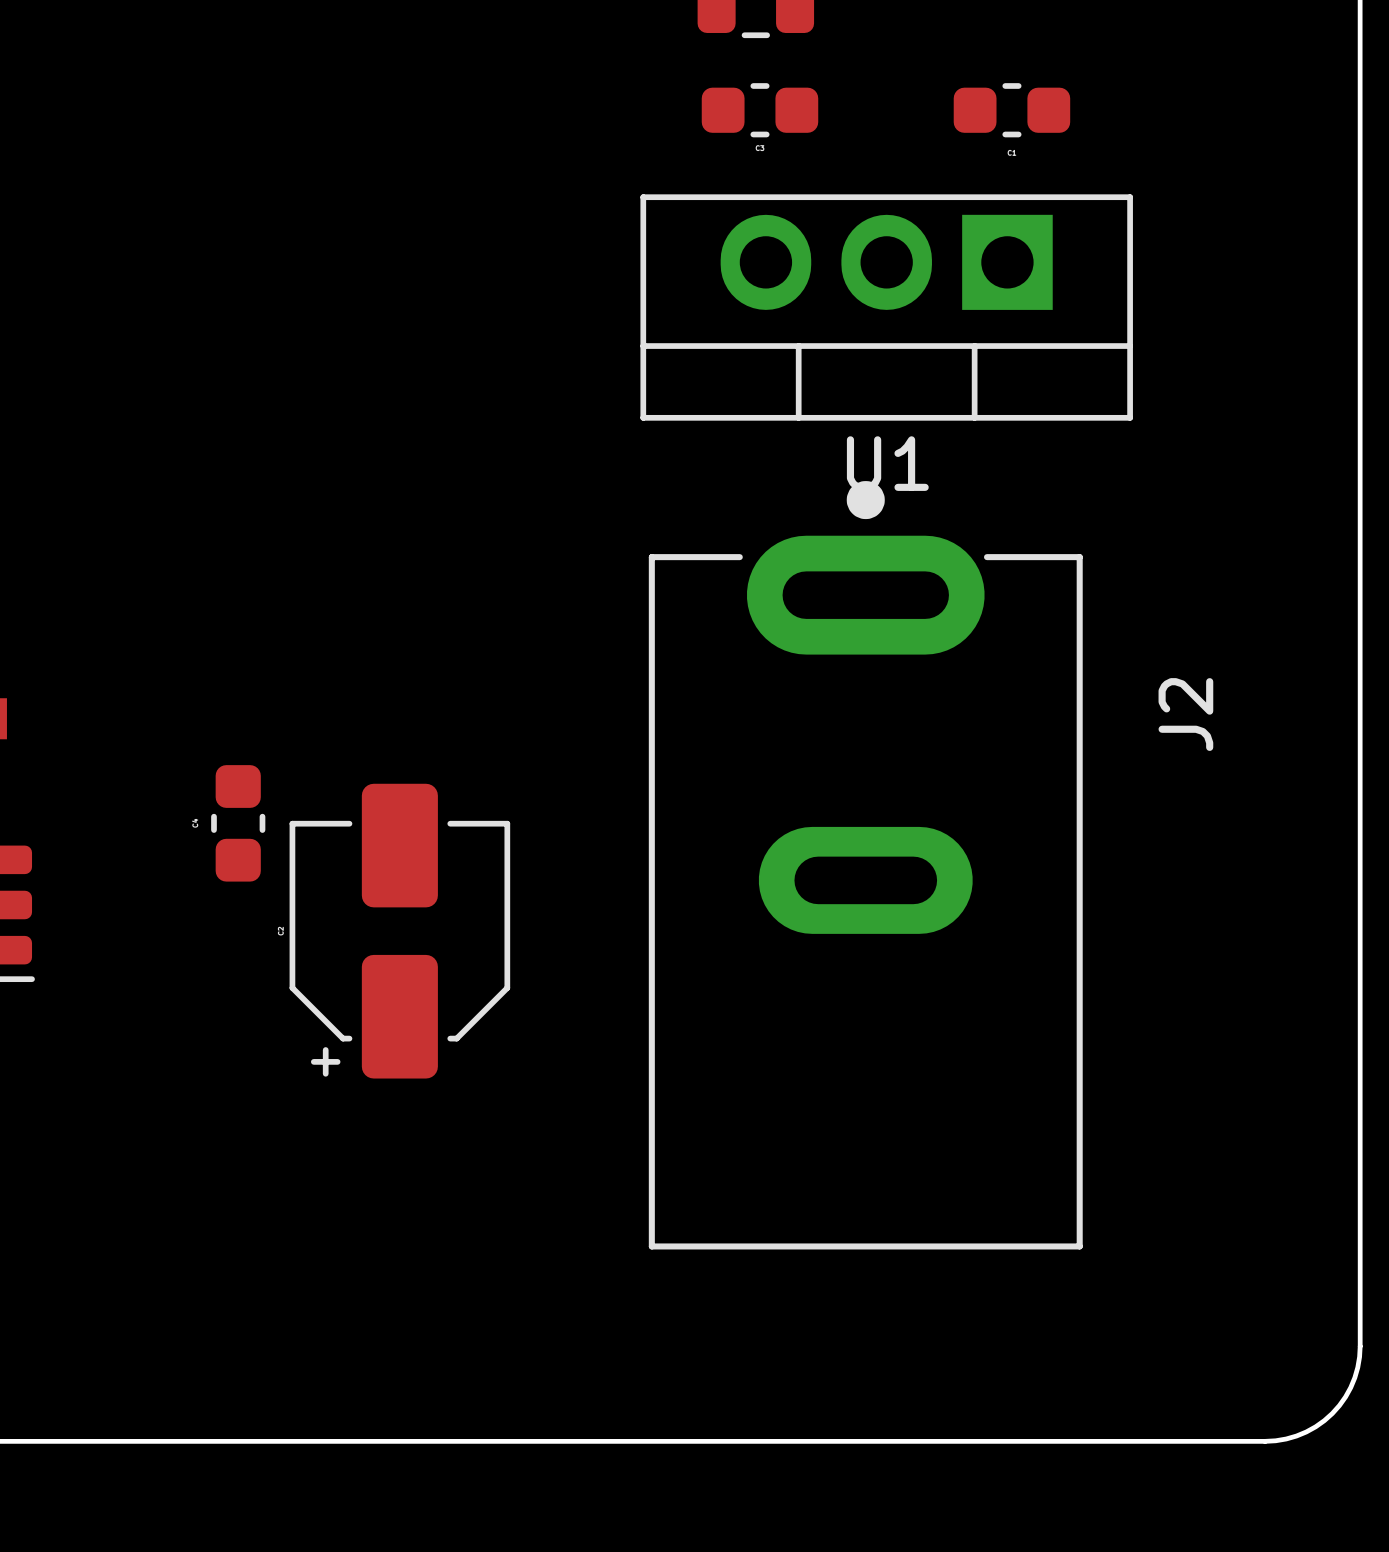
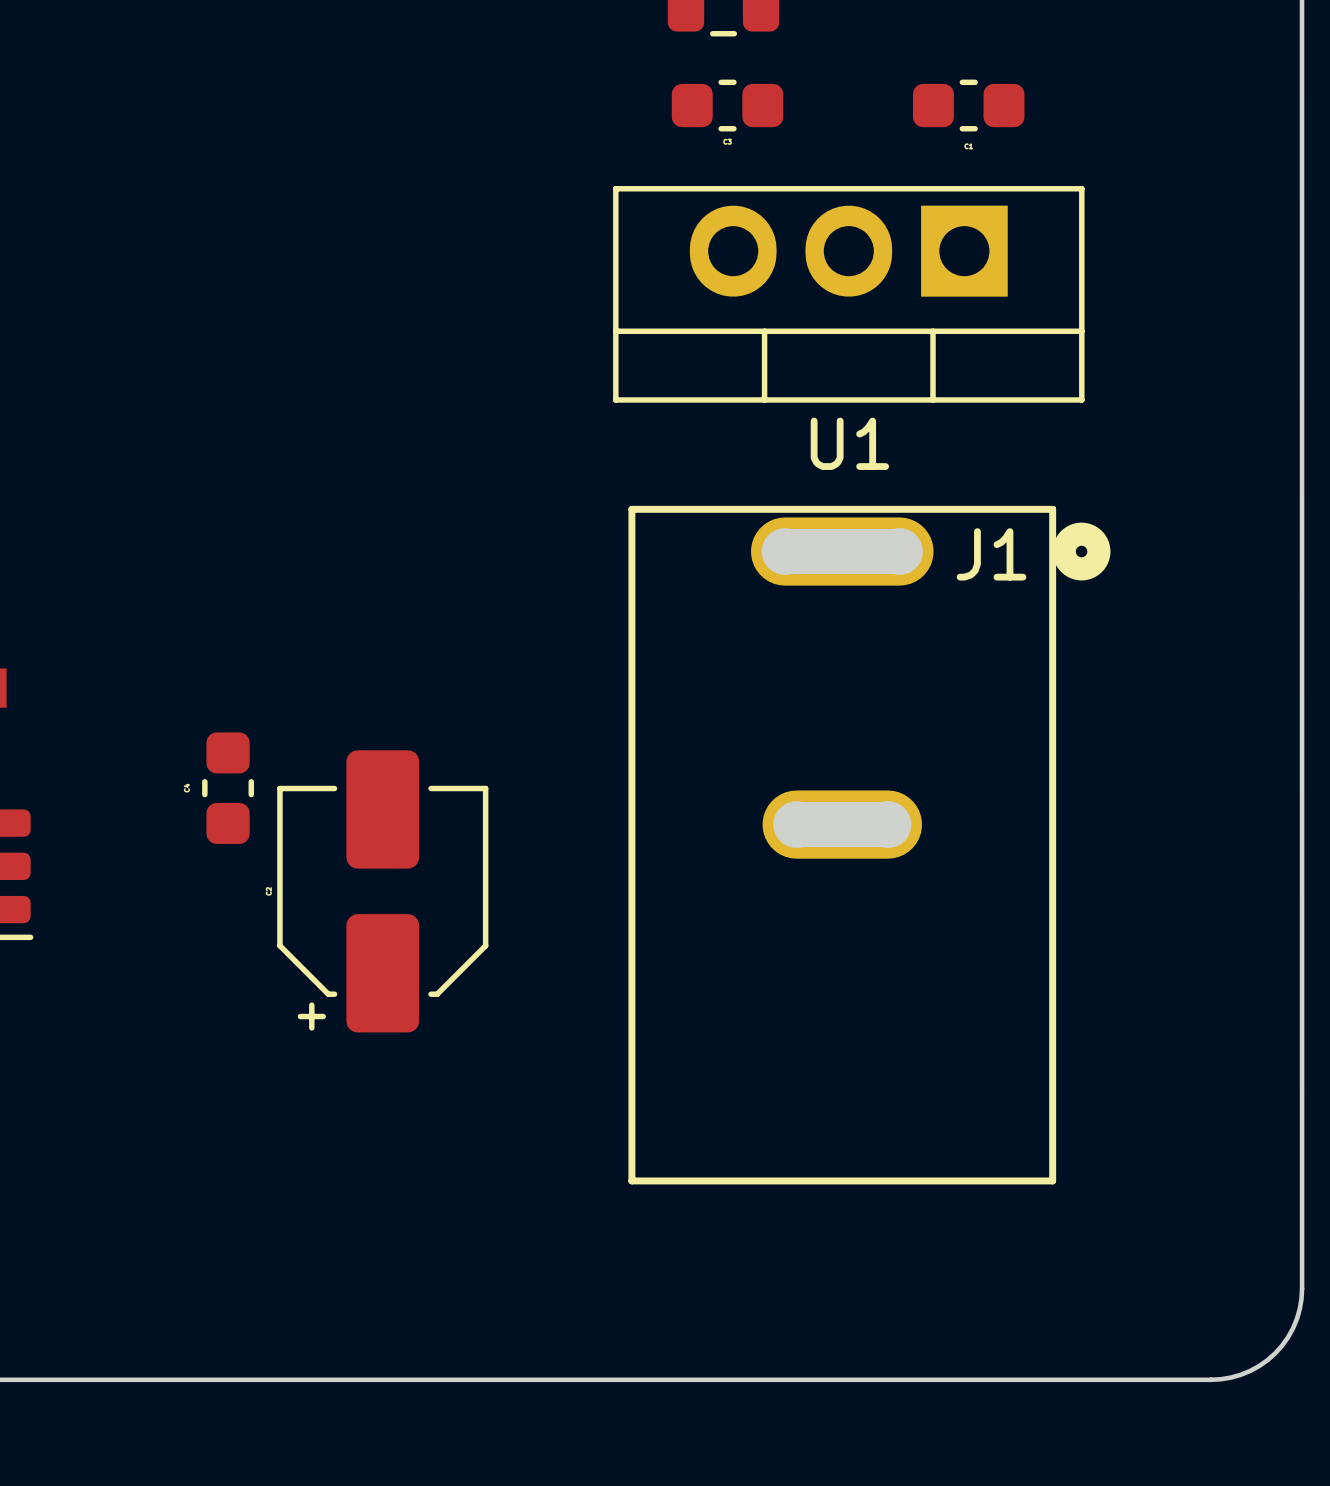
J2: (865, 865) -> none
J1: none -> (869, 845)

